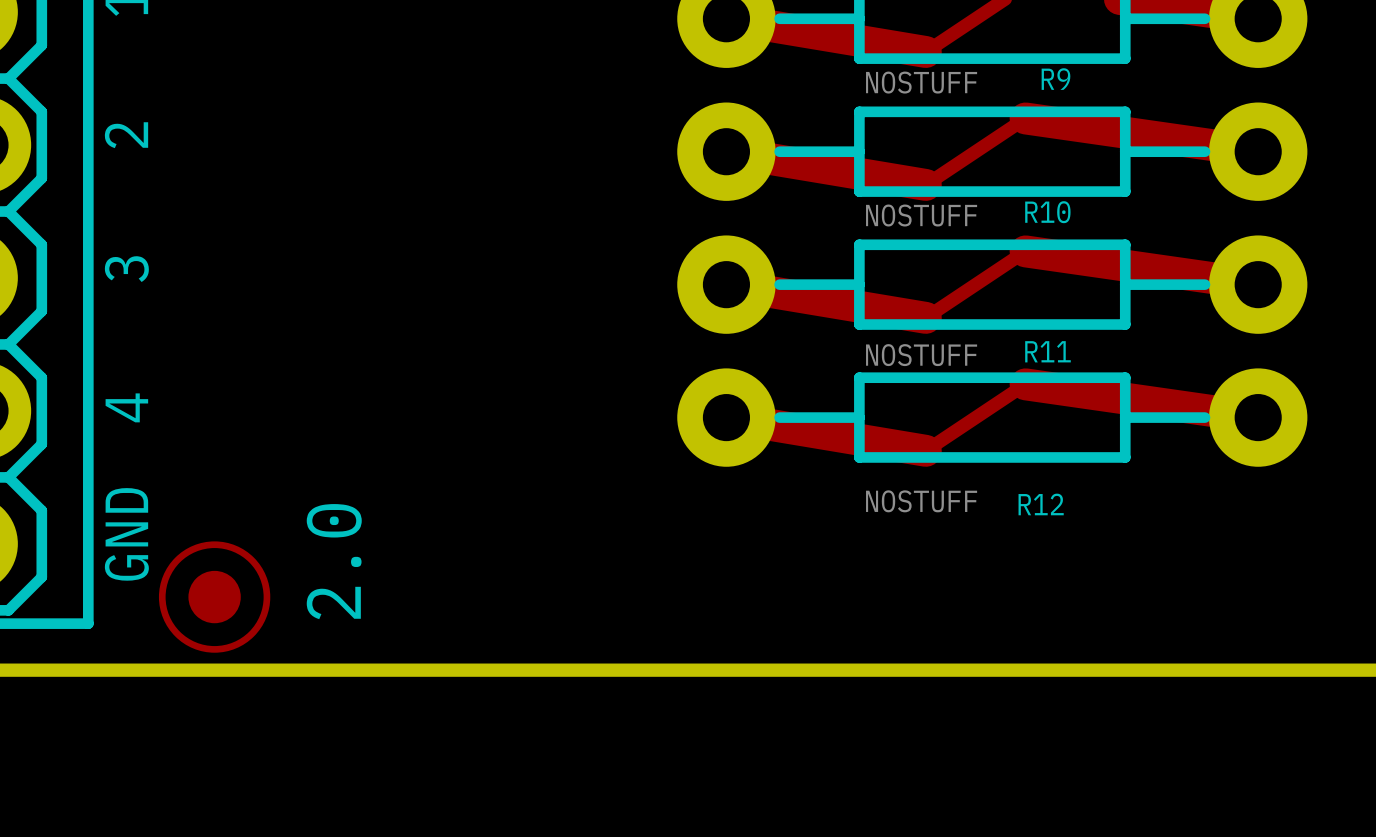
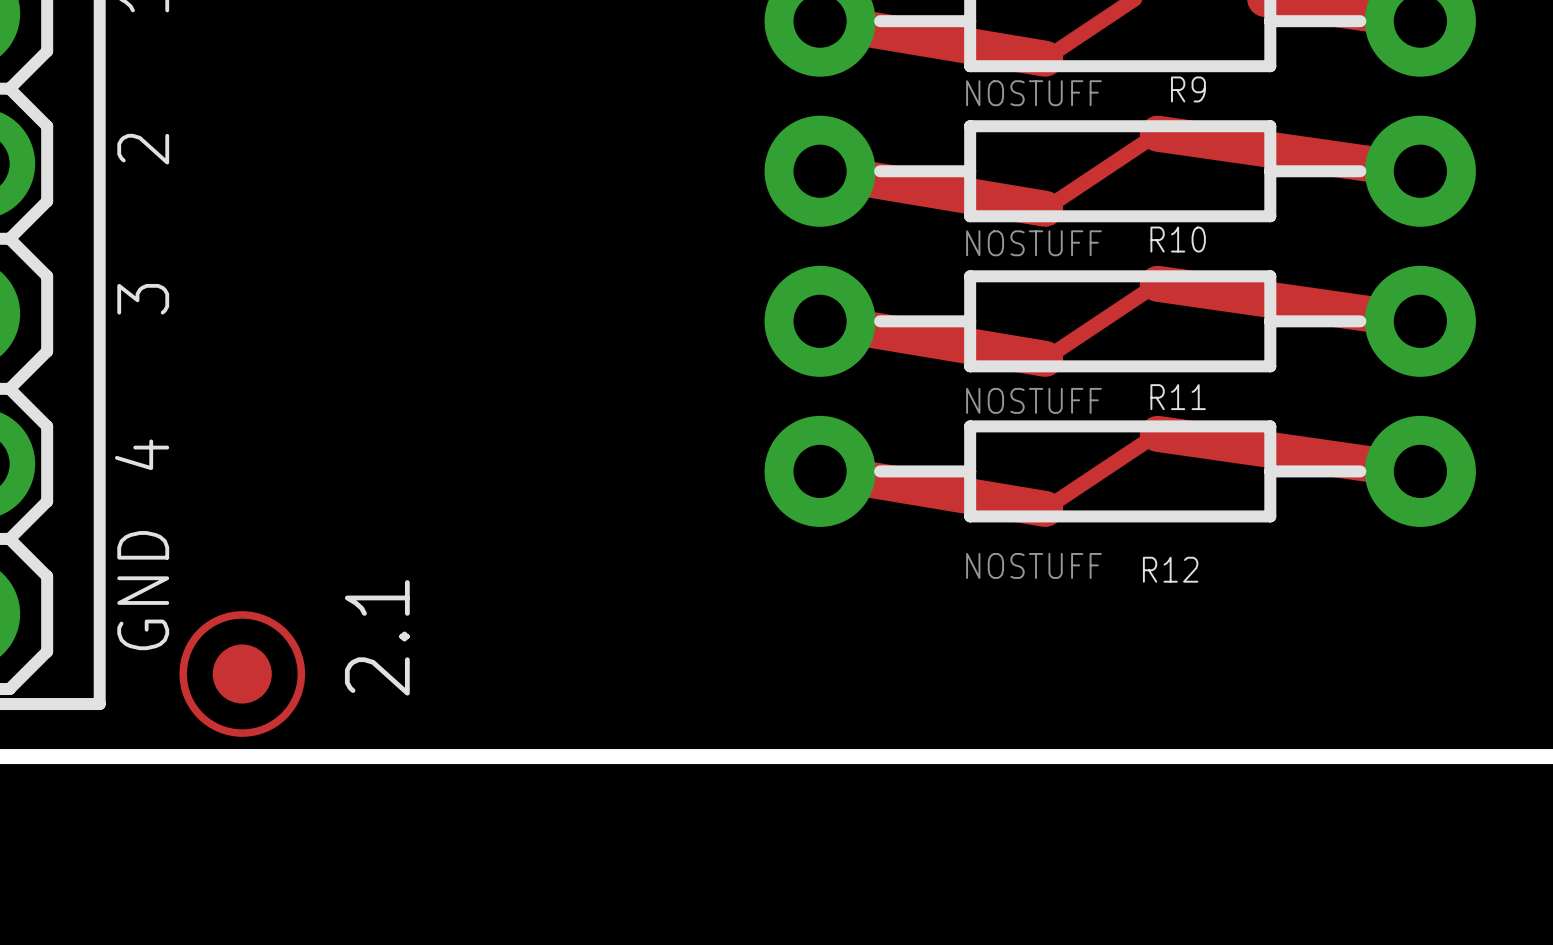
text: 2.0 (334, 561) -> 2.1 (377, 637)

